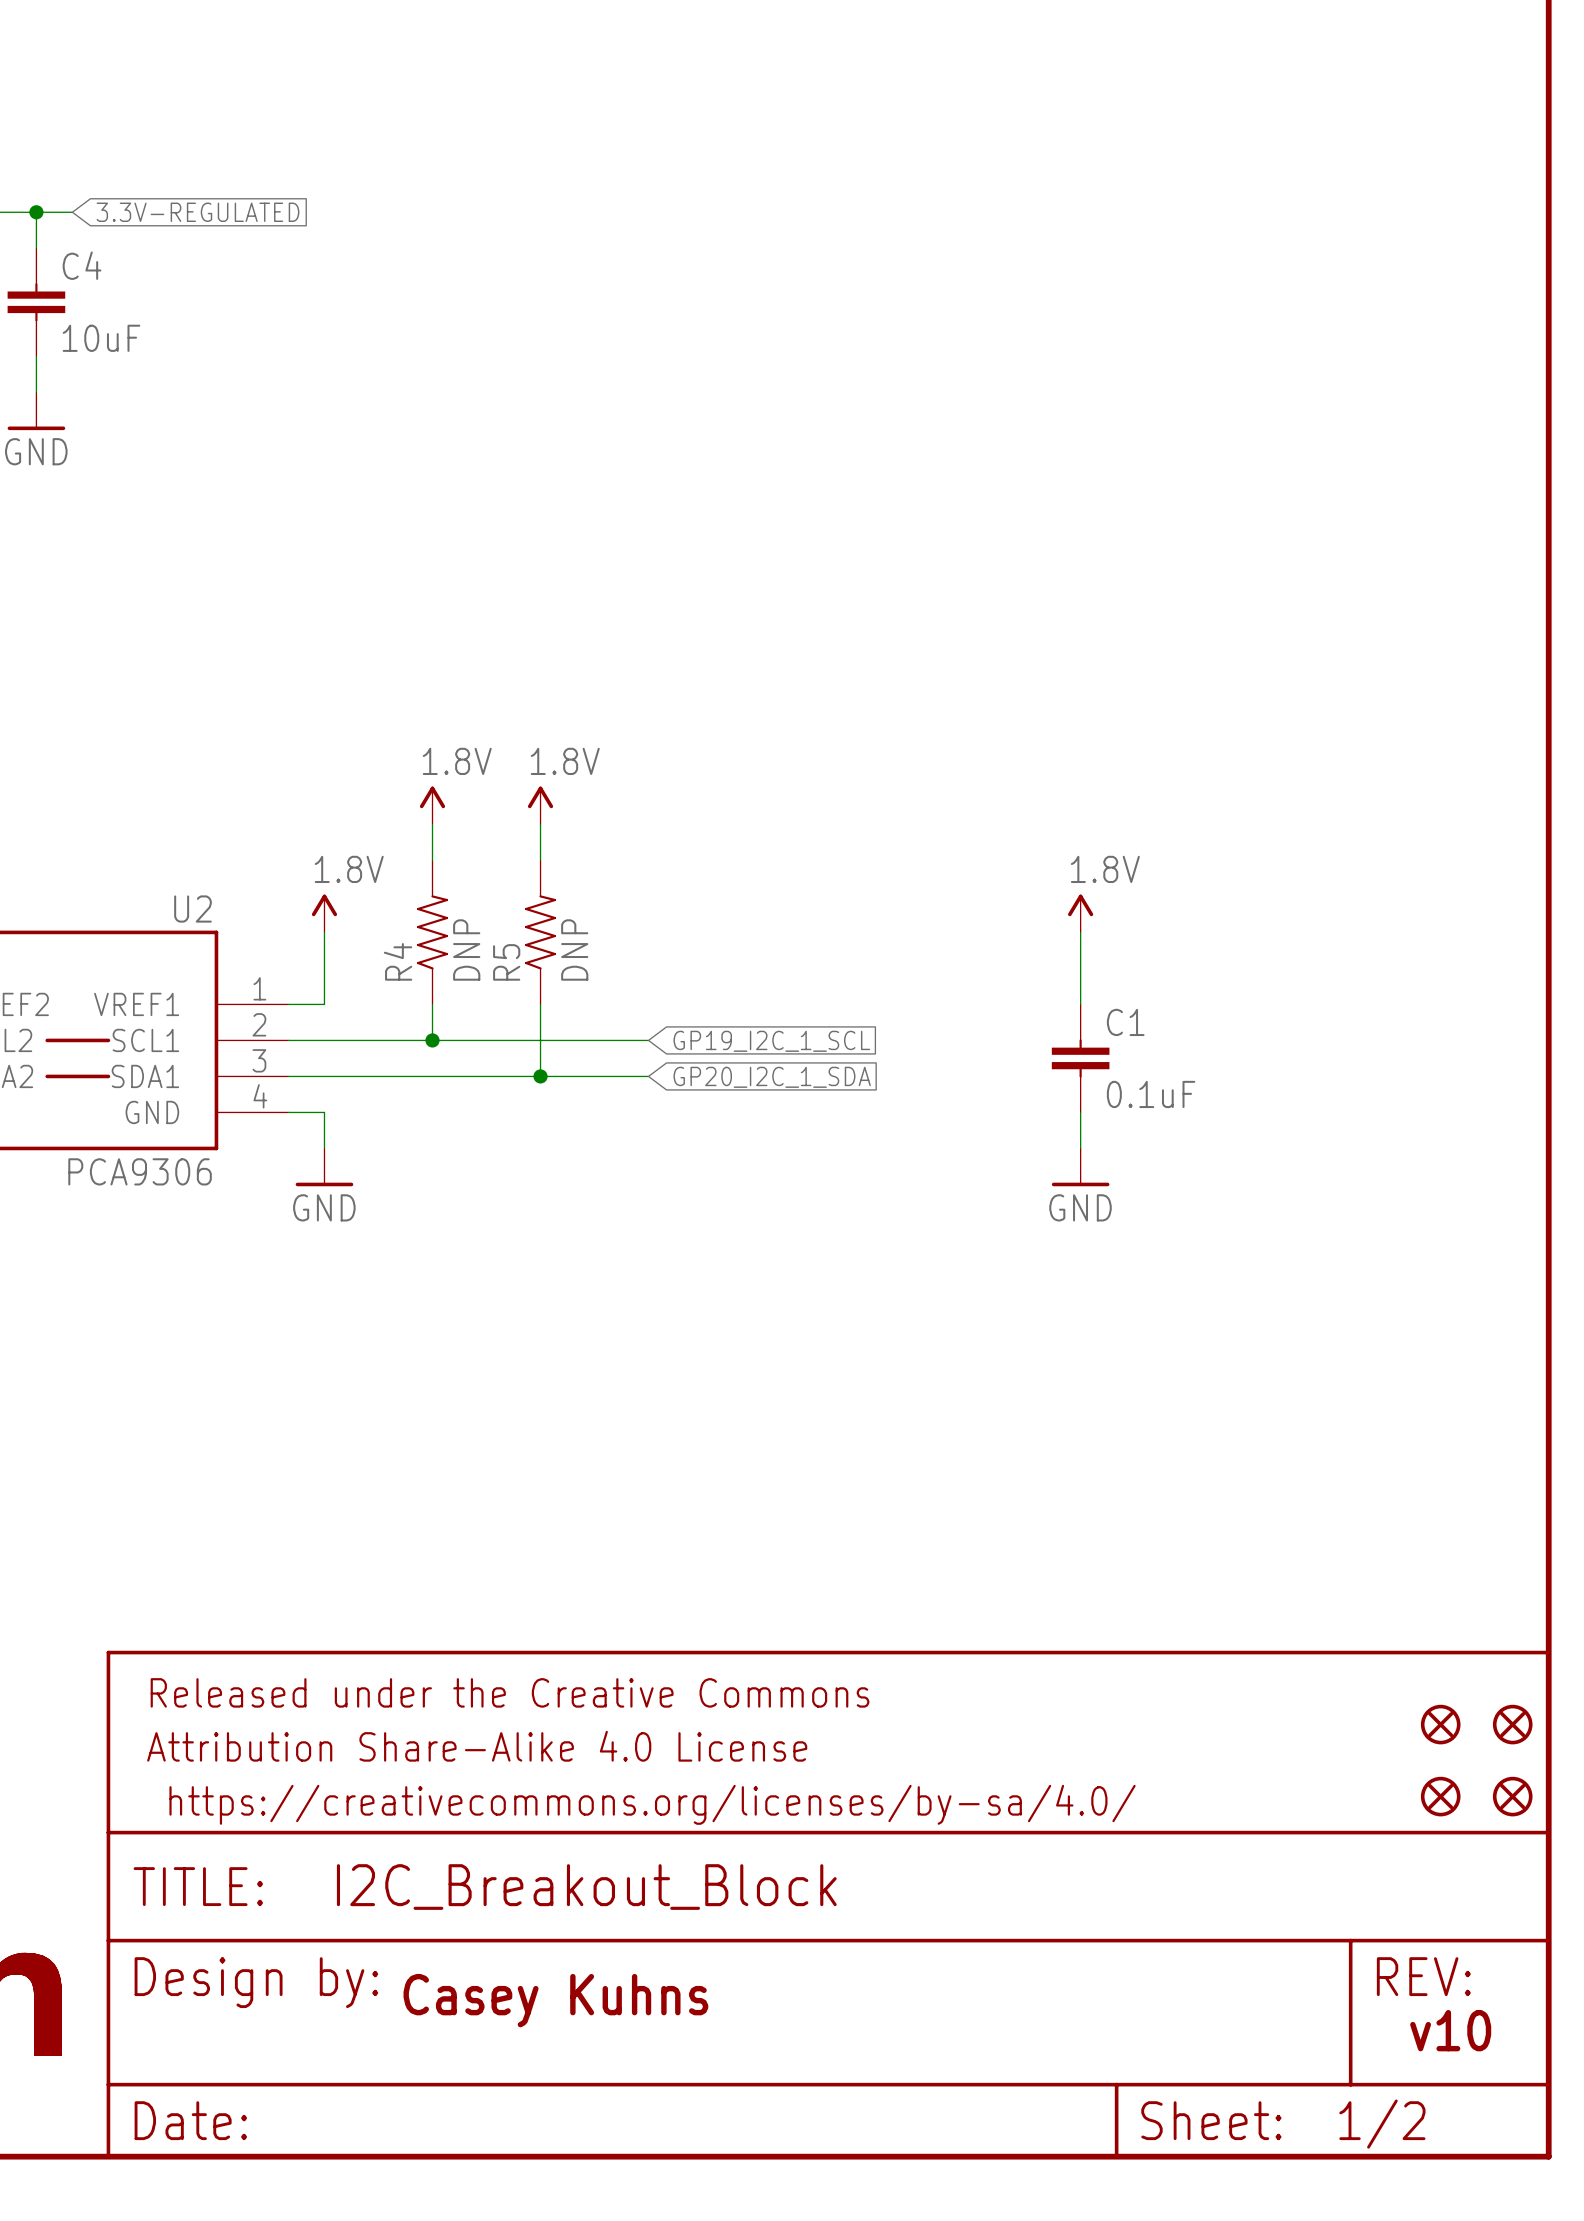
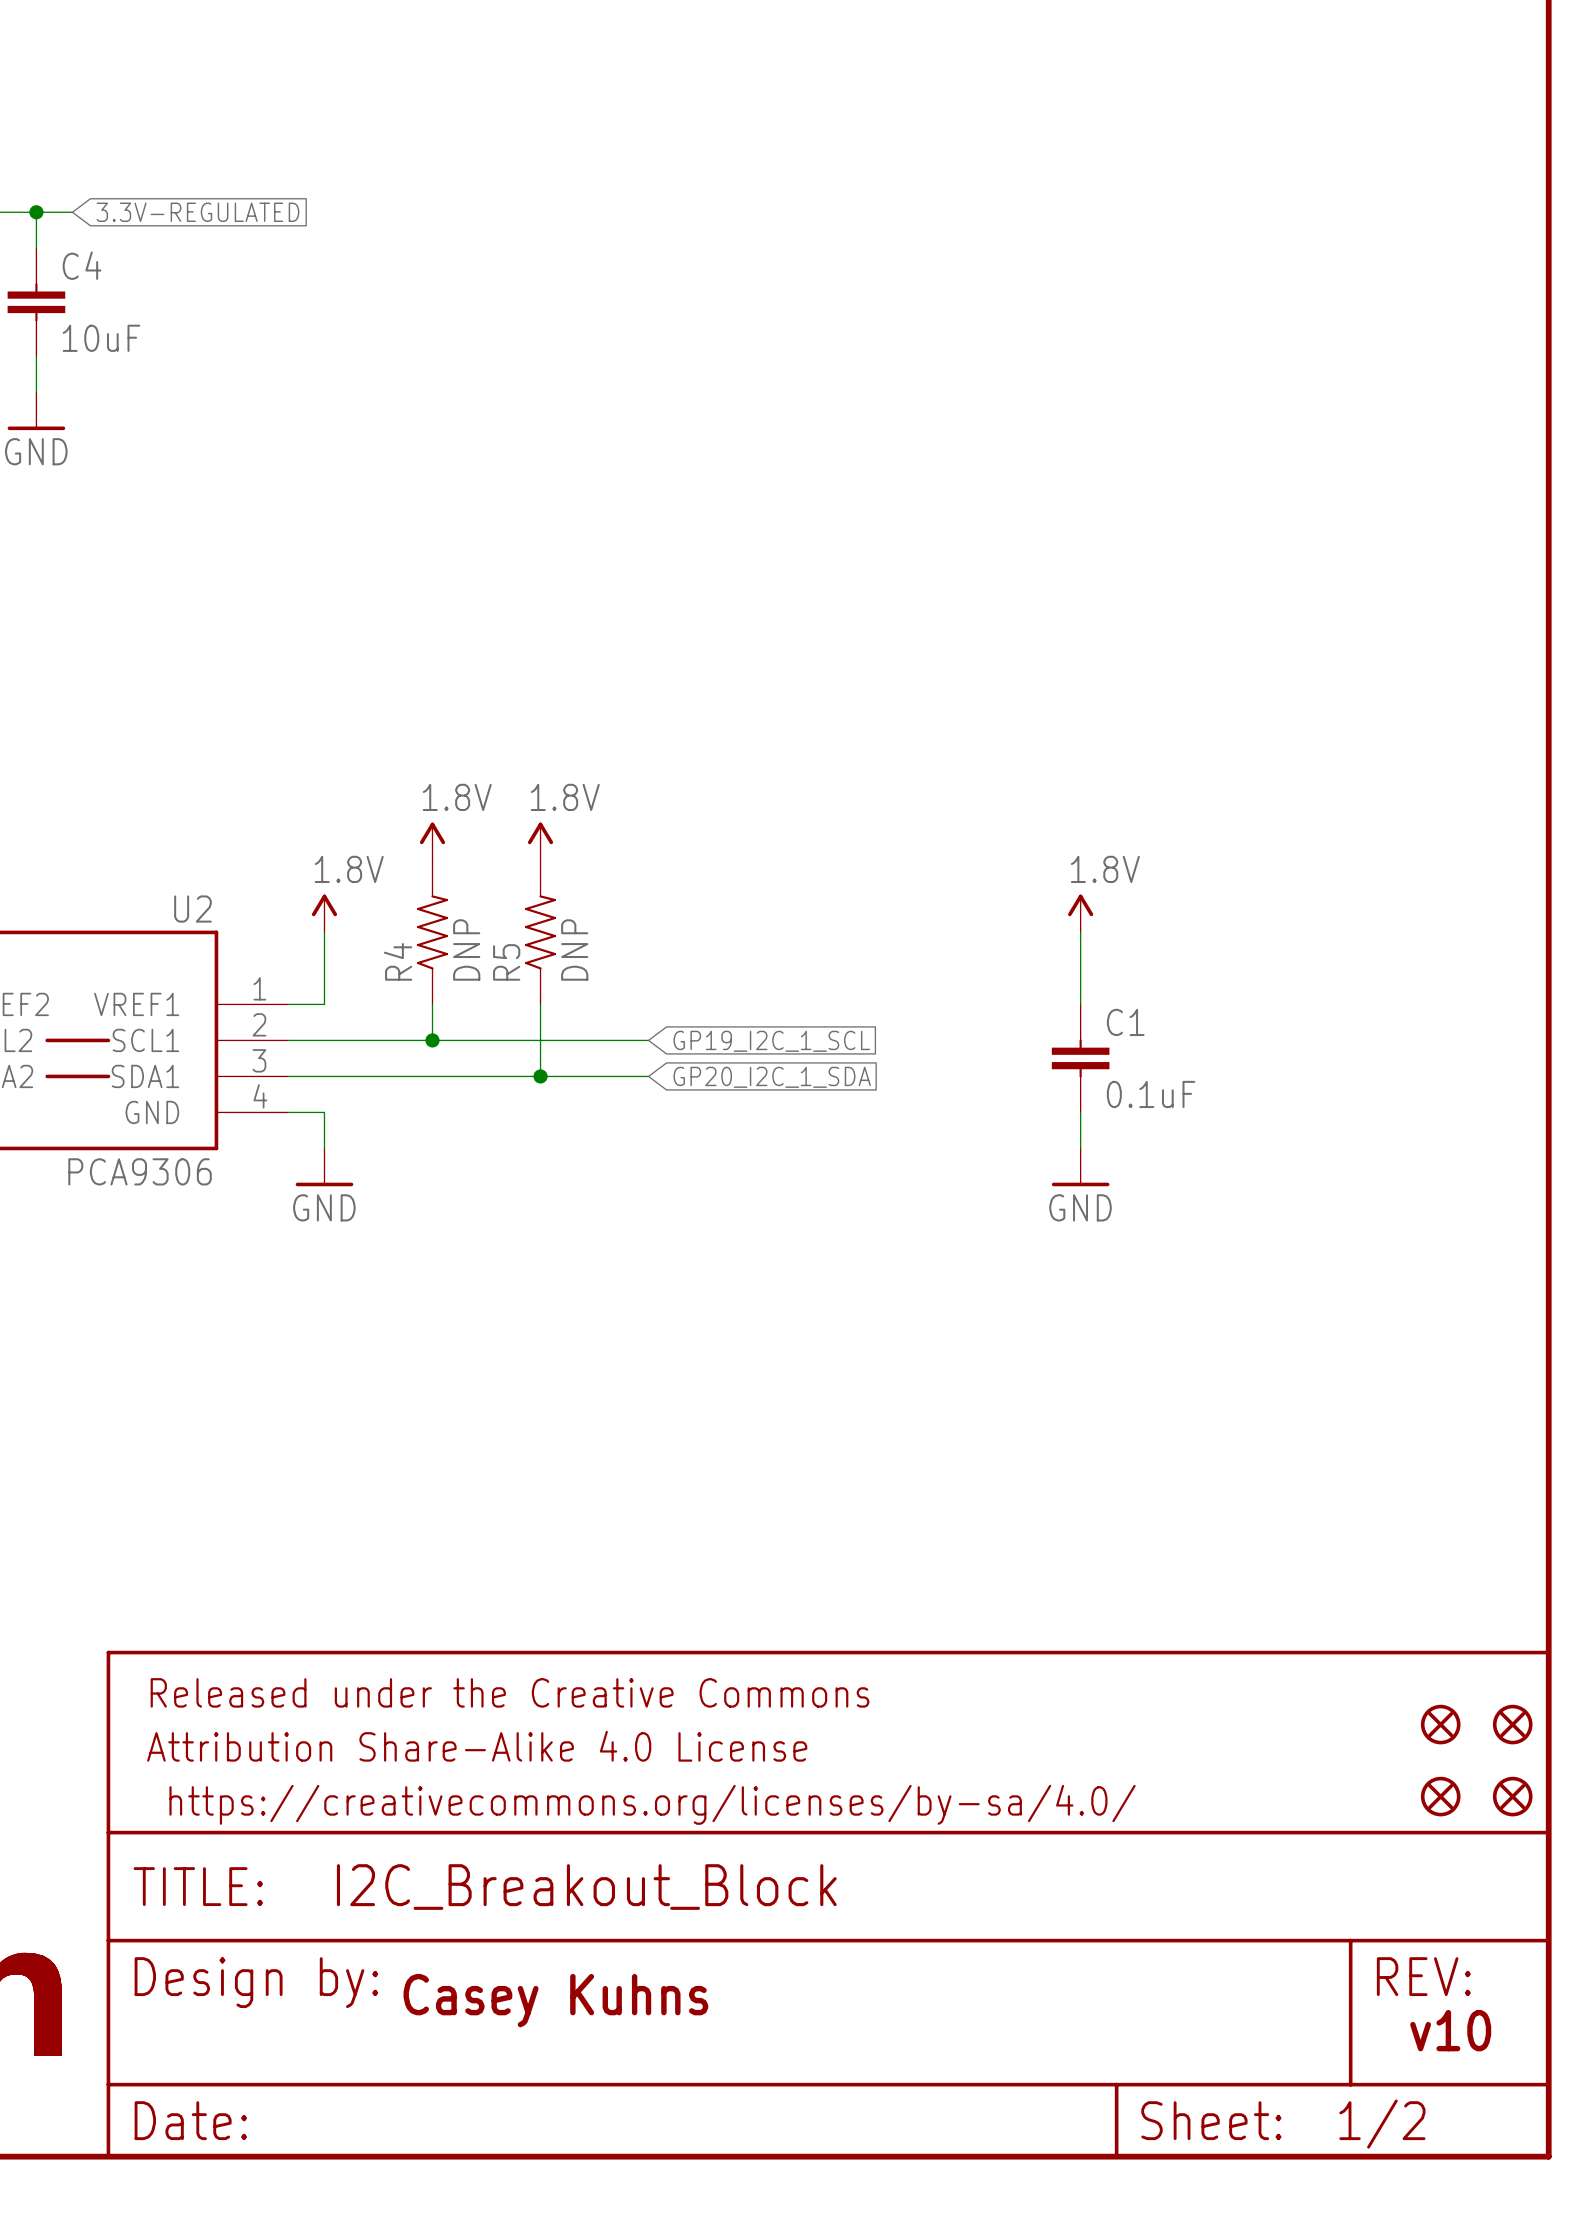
power symbol position: 1.8V (432, 805) -> 1.8V (432, 841)
power symbol position: 1.8V (540, 805) -> 1.8V (540, 841)

